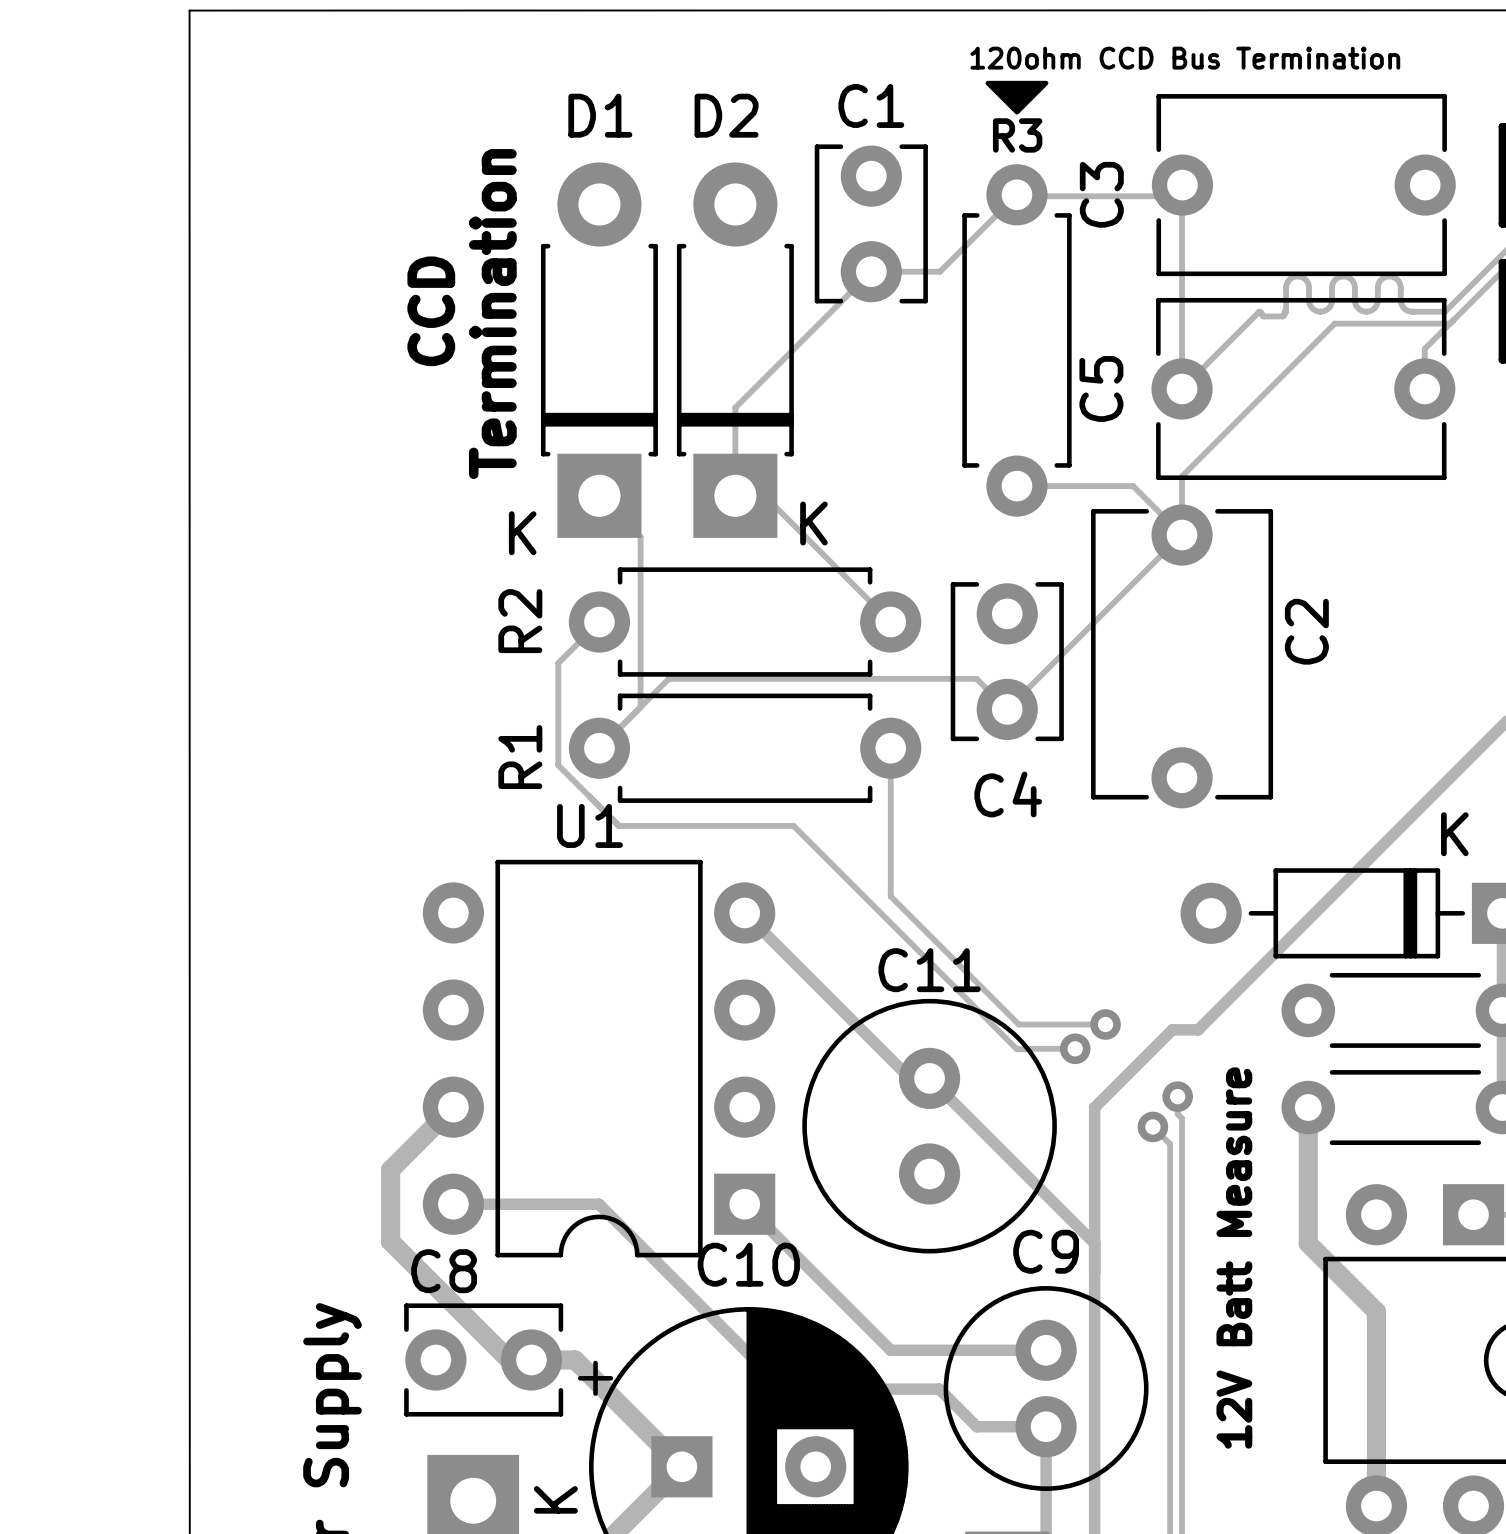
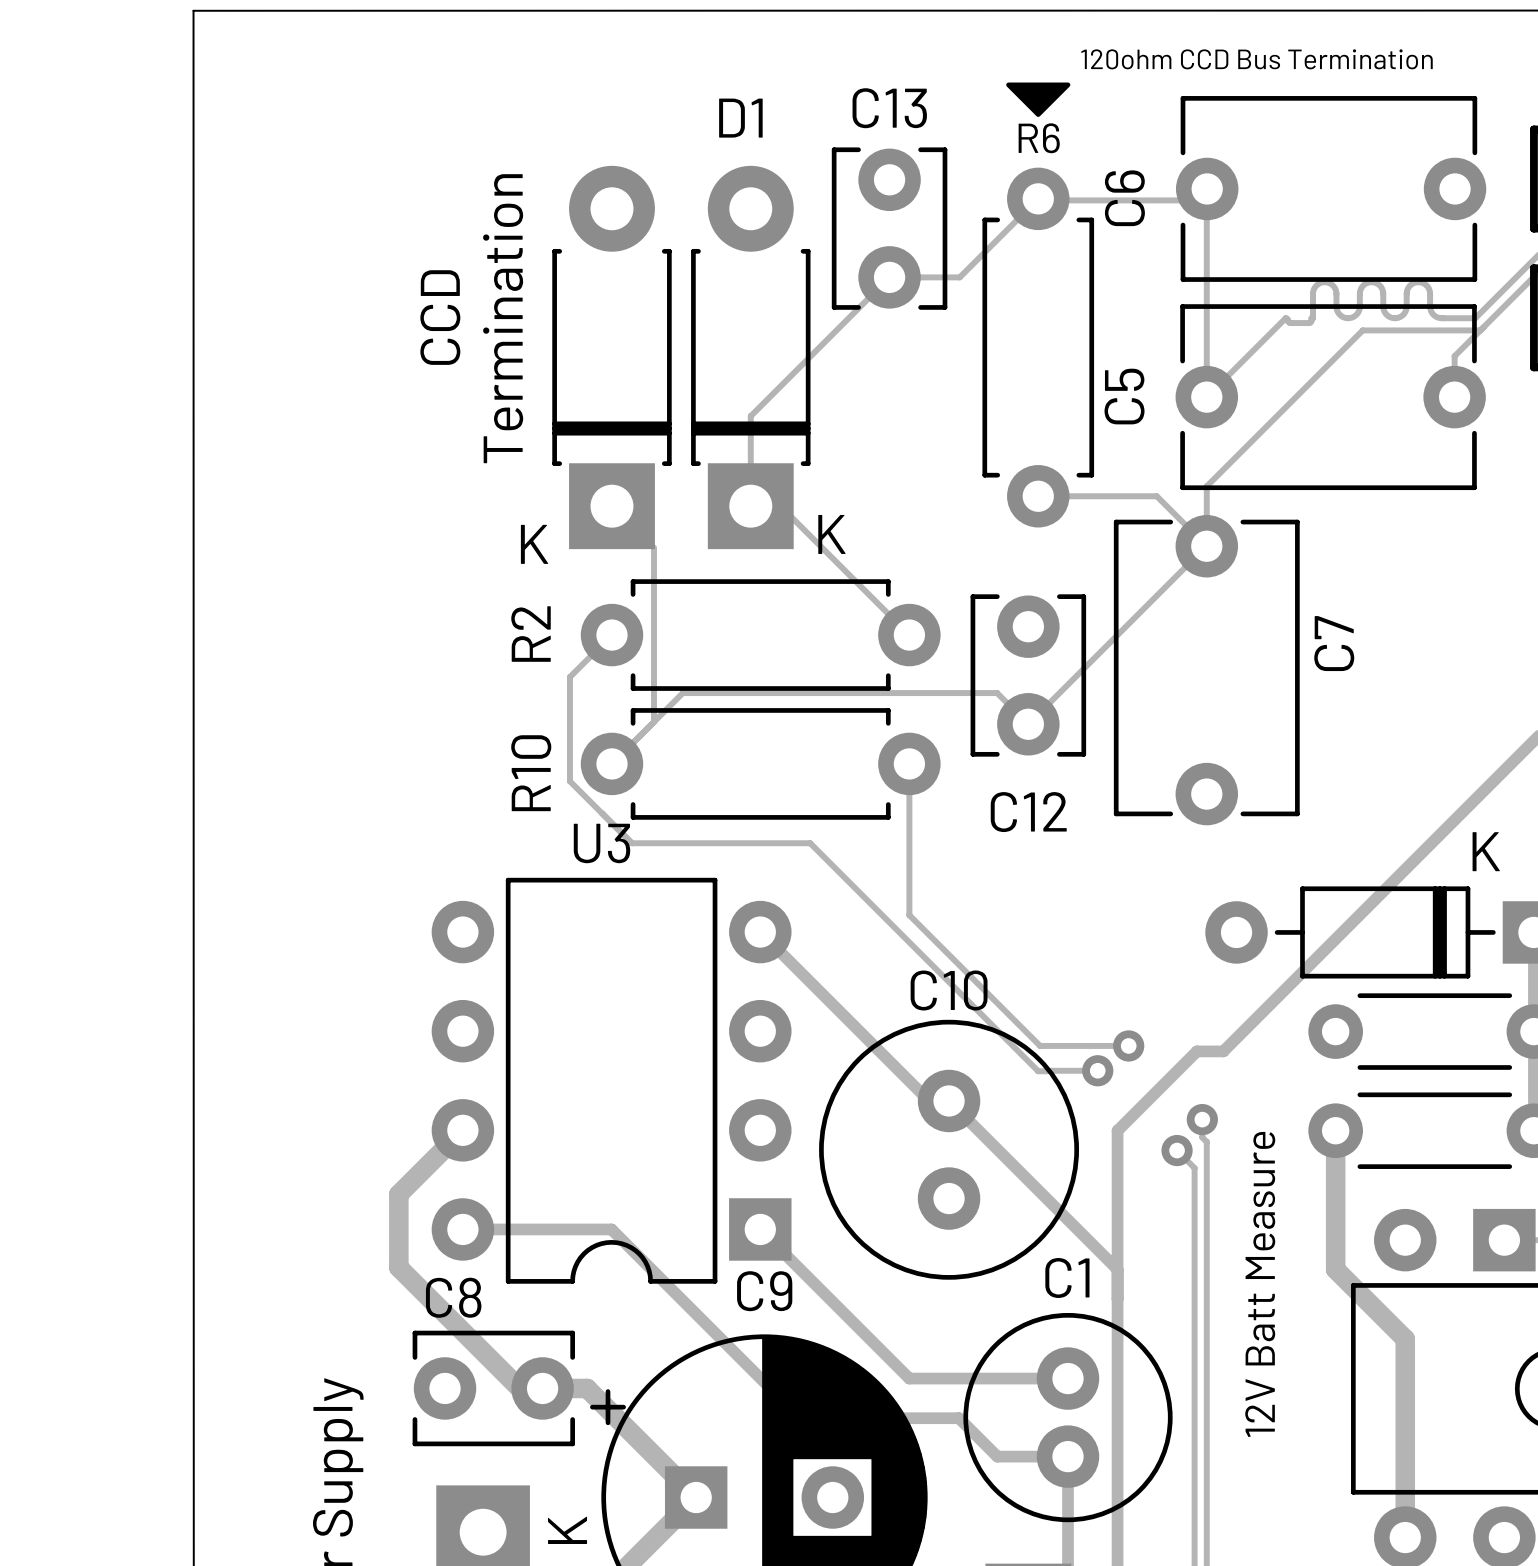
C1 name: C1 (871, 105) -> C13 (889, 108)
D1 name: D1 (600, 115) -> none
D2 name: D2 (726, 115) -> D1 (740, 118)
R3 name: R3 (1017, 135) -> R6 (1039, 138)
C3 name: C3 (1101, 194) -> C6 (1124, 198)
C2 name: C2 (1306, 631) -> C7 (1334, 643)
R1 name: R1 (520, 757) -> R10 (531, 773)
C4 name: C4 (1008, 794) -> C12 (1028, 812)
U1 name: U1 (589, 825) -> U3 (601, 843)
C11 name: C11 (929, 970) -> C10 (949, 990)
C9 name: C9 (1046, 1251) -> C1 (1067, 1277)
C10 name: C10 (748, 1264) -> C9 (764, 1291)

